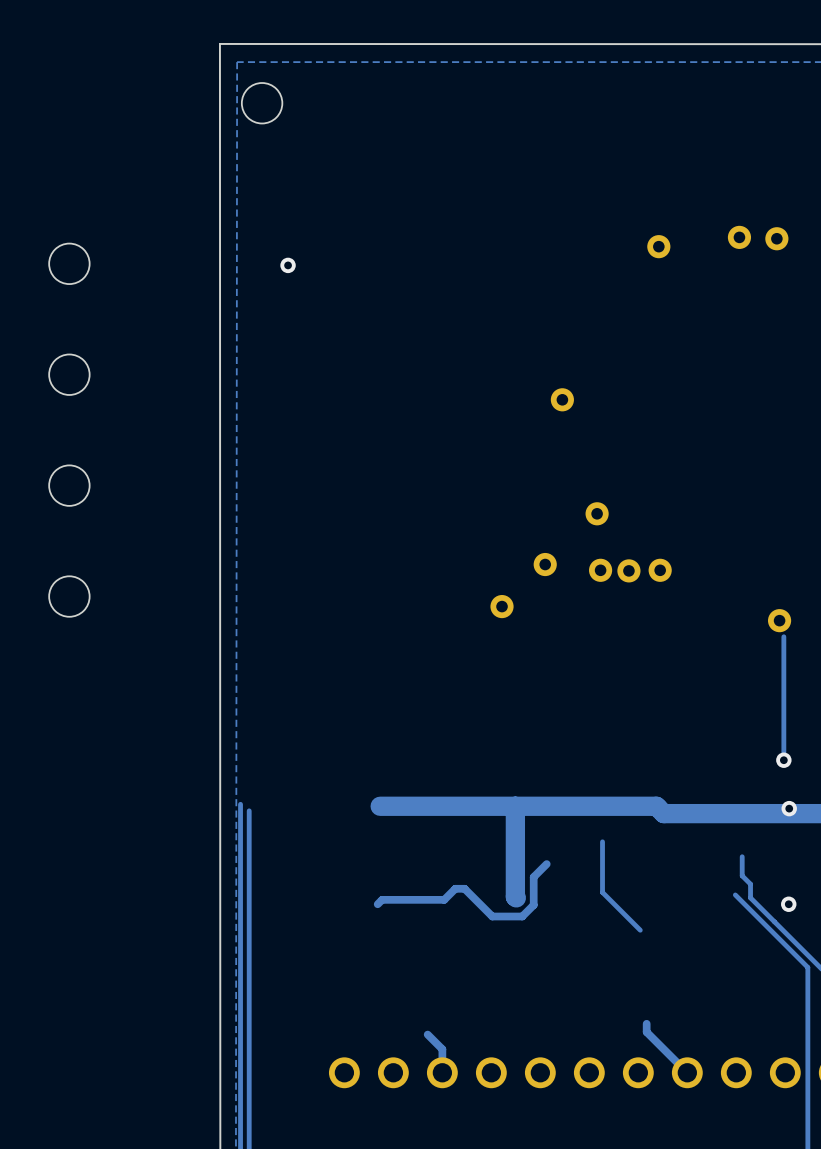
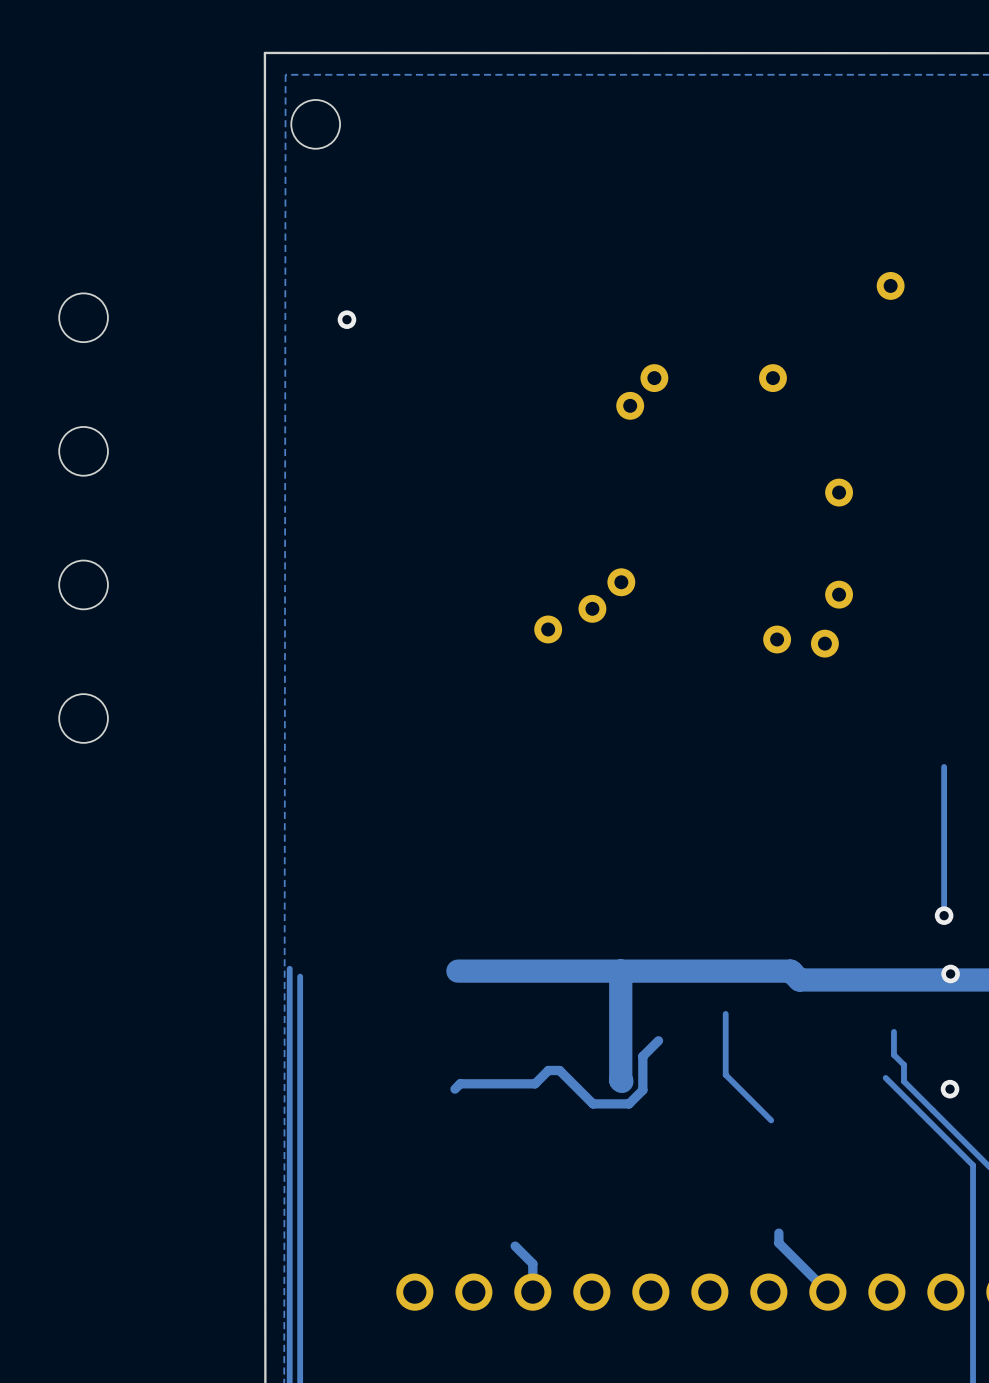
part: (776, 238) -> none
part: (658, 246) -> none
part: none -> (654, 378)
part: none -> (772, 378)
part: none -> (630, 405)
part: (562, 399) -> none
part: none -> (839, 492)
part: none -> (621, 582)
part: none -> (839, 594)
part: none -> (592, 608)
part: (597, 513) -> none
part: none -> (548, 629)
part: none -> (777, 639)
part: none -> (824, 643)
part: (545, 564) -> none
part: (600, 570) -> none
part: (628, 570) -> none
part: (660, 570) -> none
part: (502, 606) -> none
part: (779, 620) -> none

